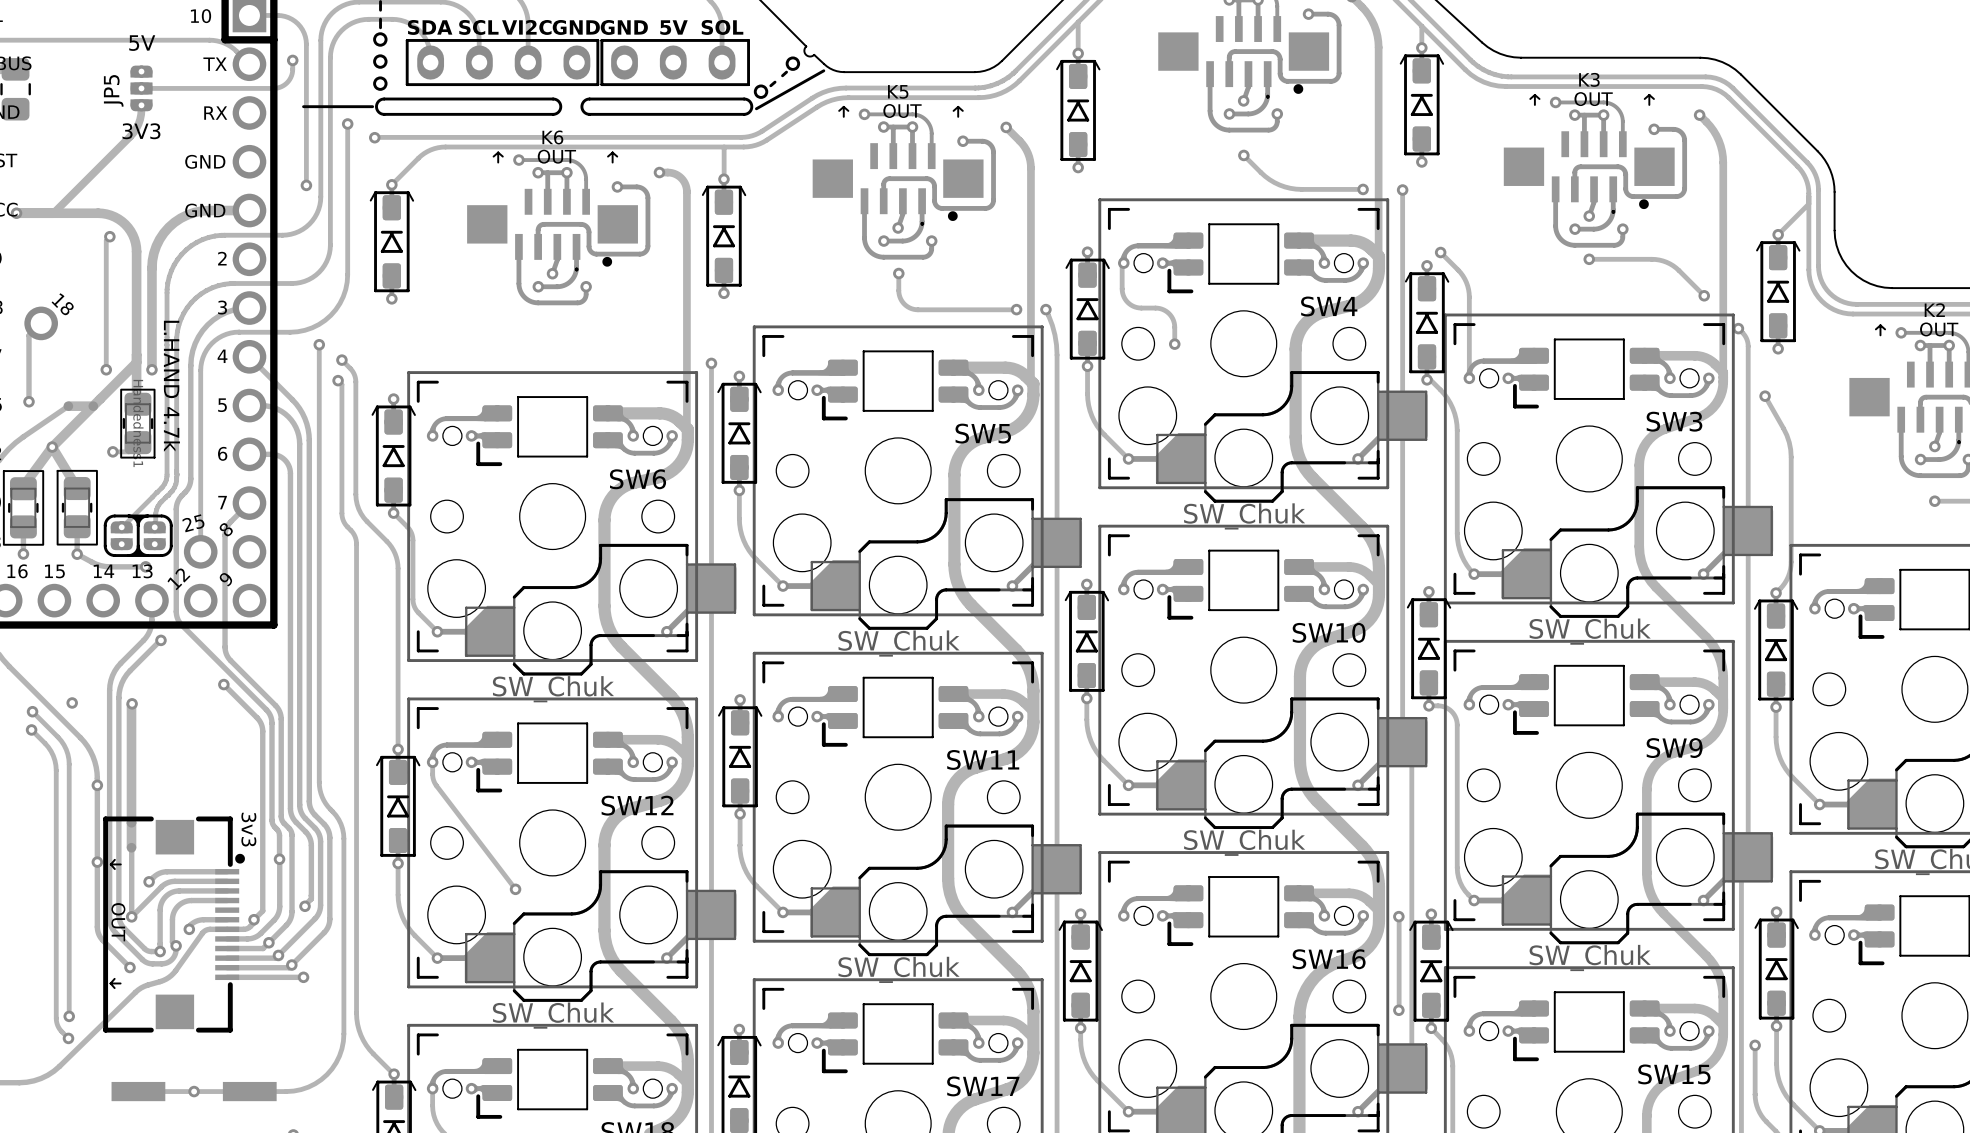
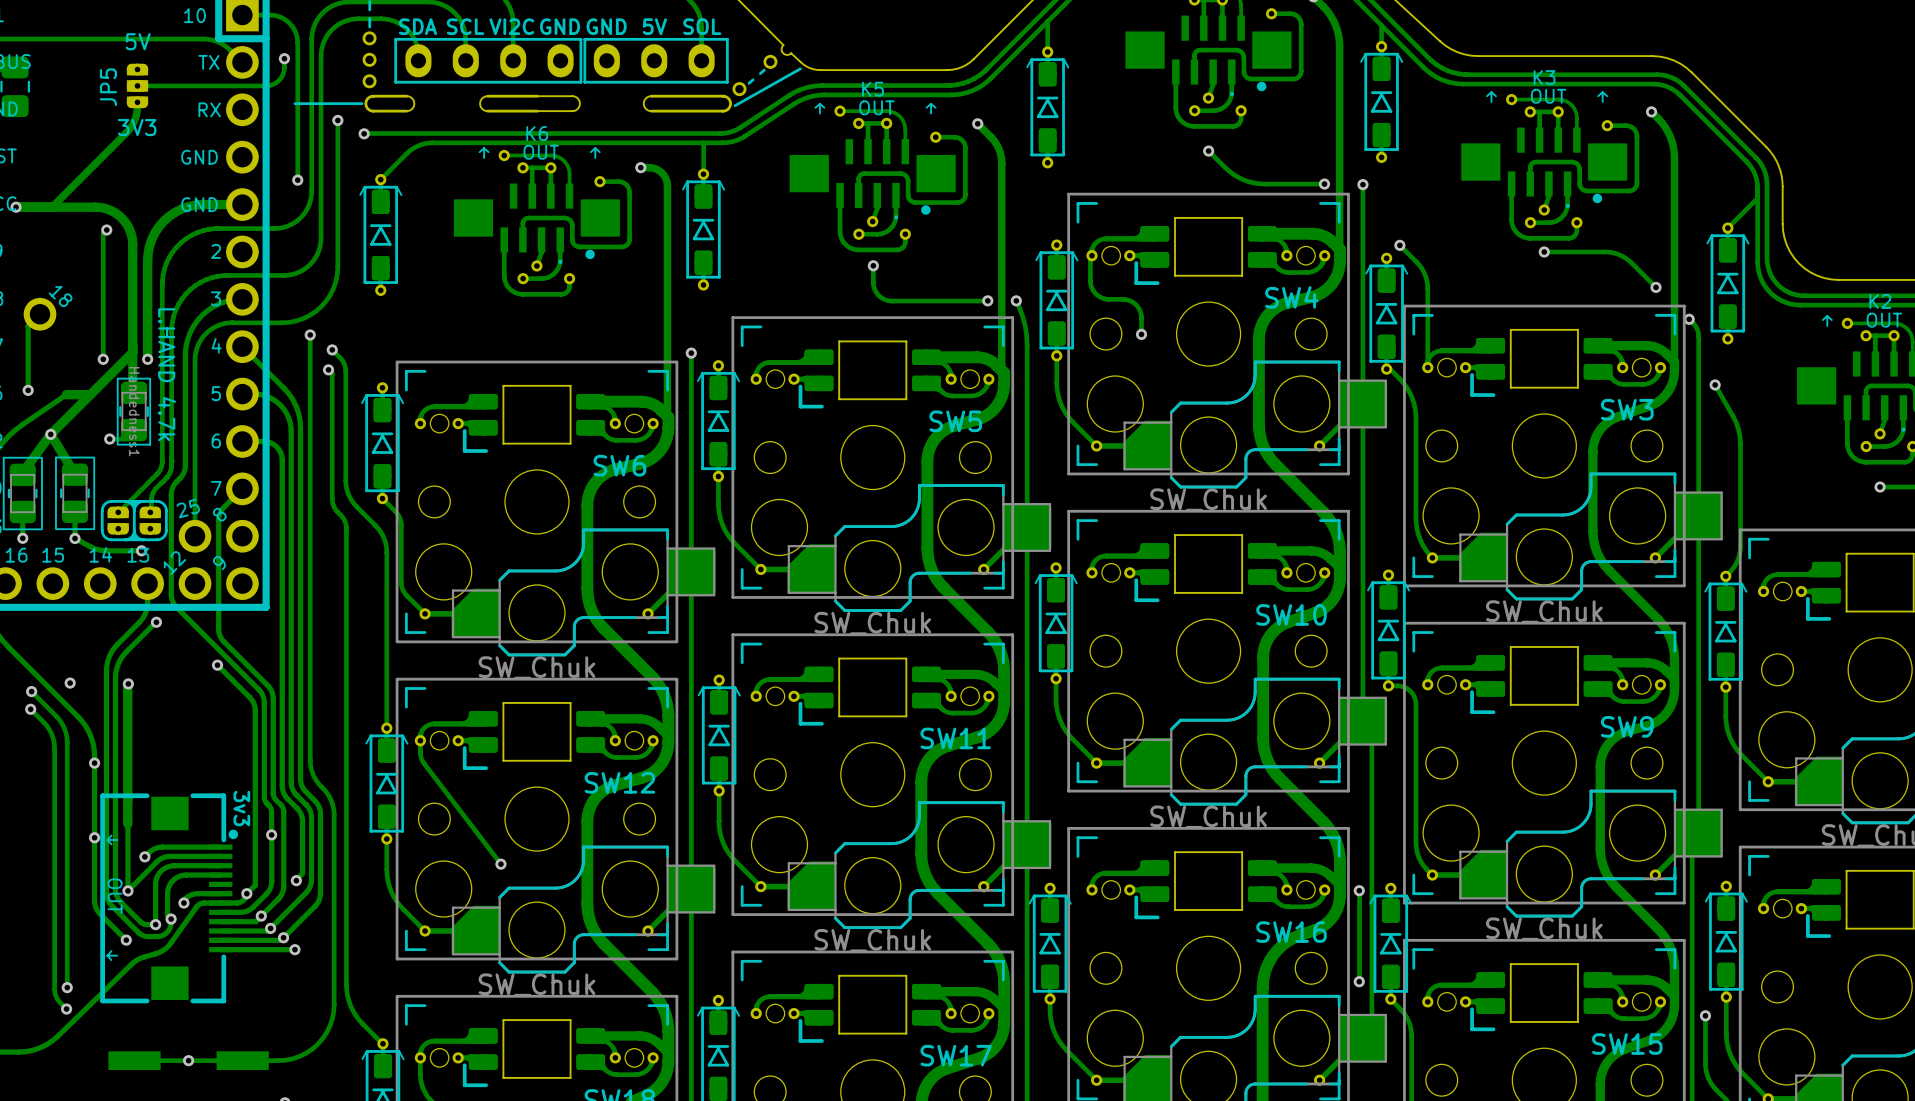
board edge: (501, 99) (418, 99) -> (487, 96) (482, 98) (480, 103) (482, 109) (487, 111)
board edge: (553, 99) (558, 100) (560, 106) (558, 111) (553, 114) -> (537, 96) (573, 96) (577, 98) (579, 103) (577, 108) (573, 111) (537, 111)
board edge: (670, 99) (588, 99) (583, 102) (581, 106) (583, 111) (588, 114) (670, 114) -> (651, 96) (645, 98) (643, 103) (645, 108) (651, 111)
board edge: (501, 114) (418, 114) -> (406, 96) (412, 98) (414, 103) (412, 108) (406, 111)

